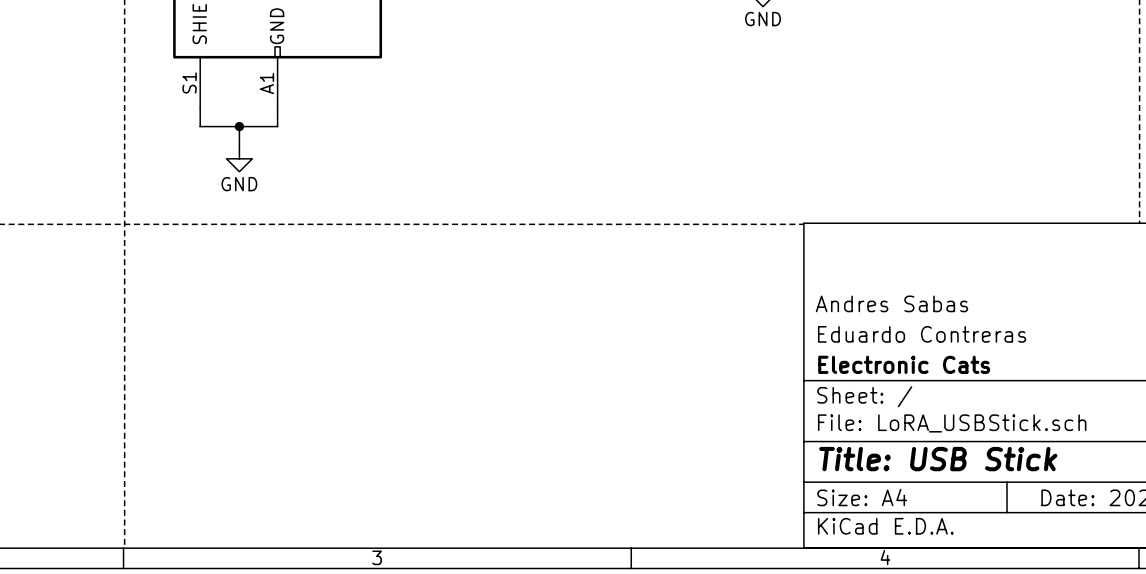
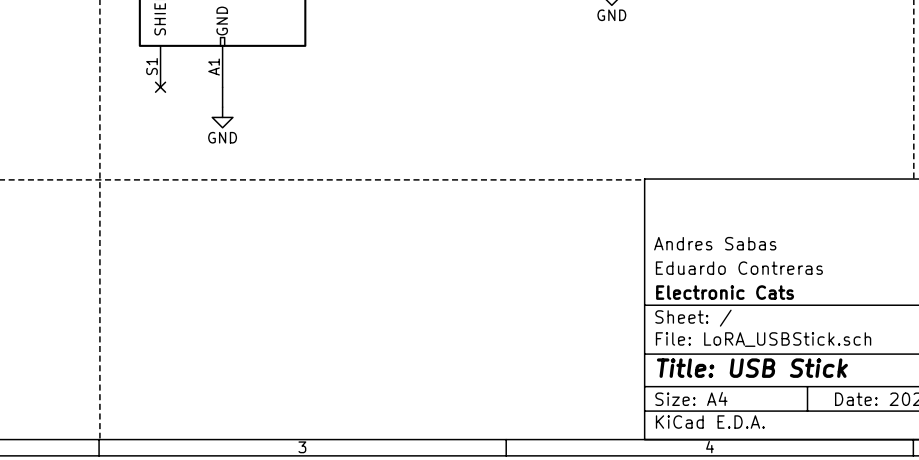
wire: (200, 108) (200, 126) (277, 126) -> (222, 107) (222, 101)
no-connect mark: none -> (160, 87)
wire: (239, 126) (239, 145) -> none
junction: (239, 126) -> none
power symbol position: GND (239, 158) -> GND (222, 117)

